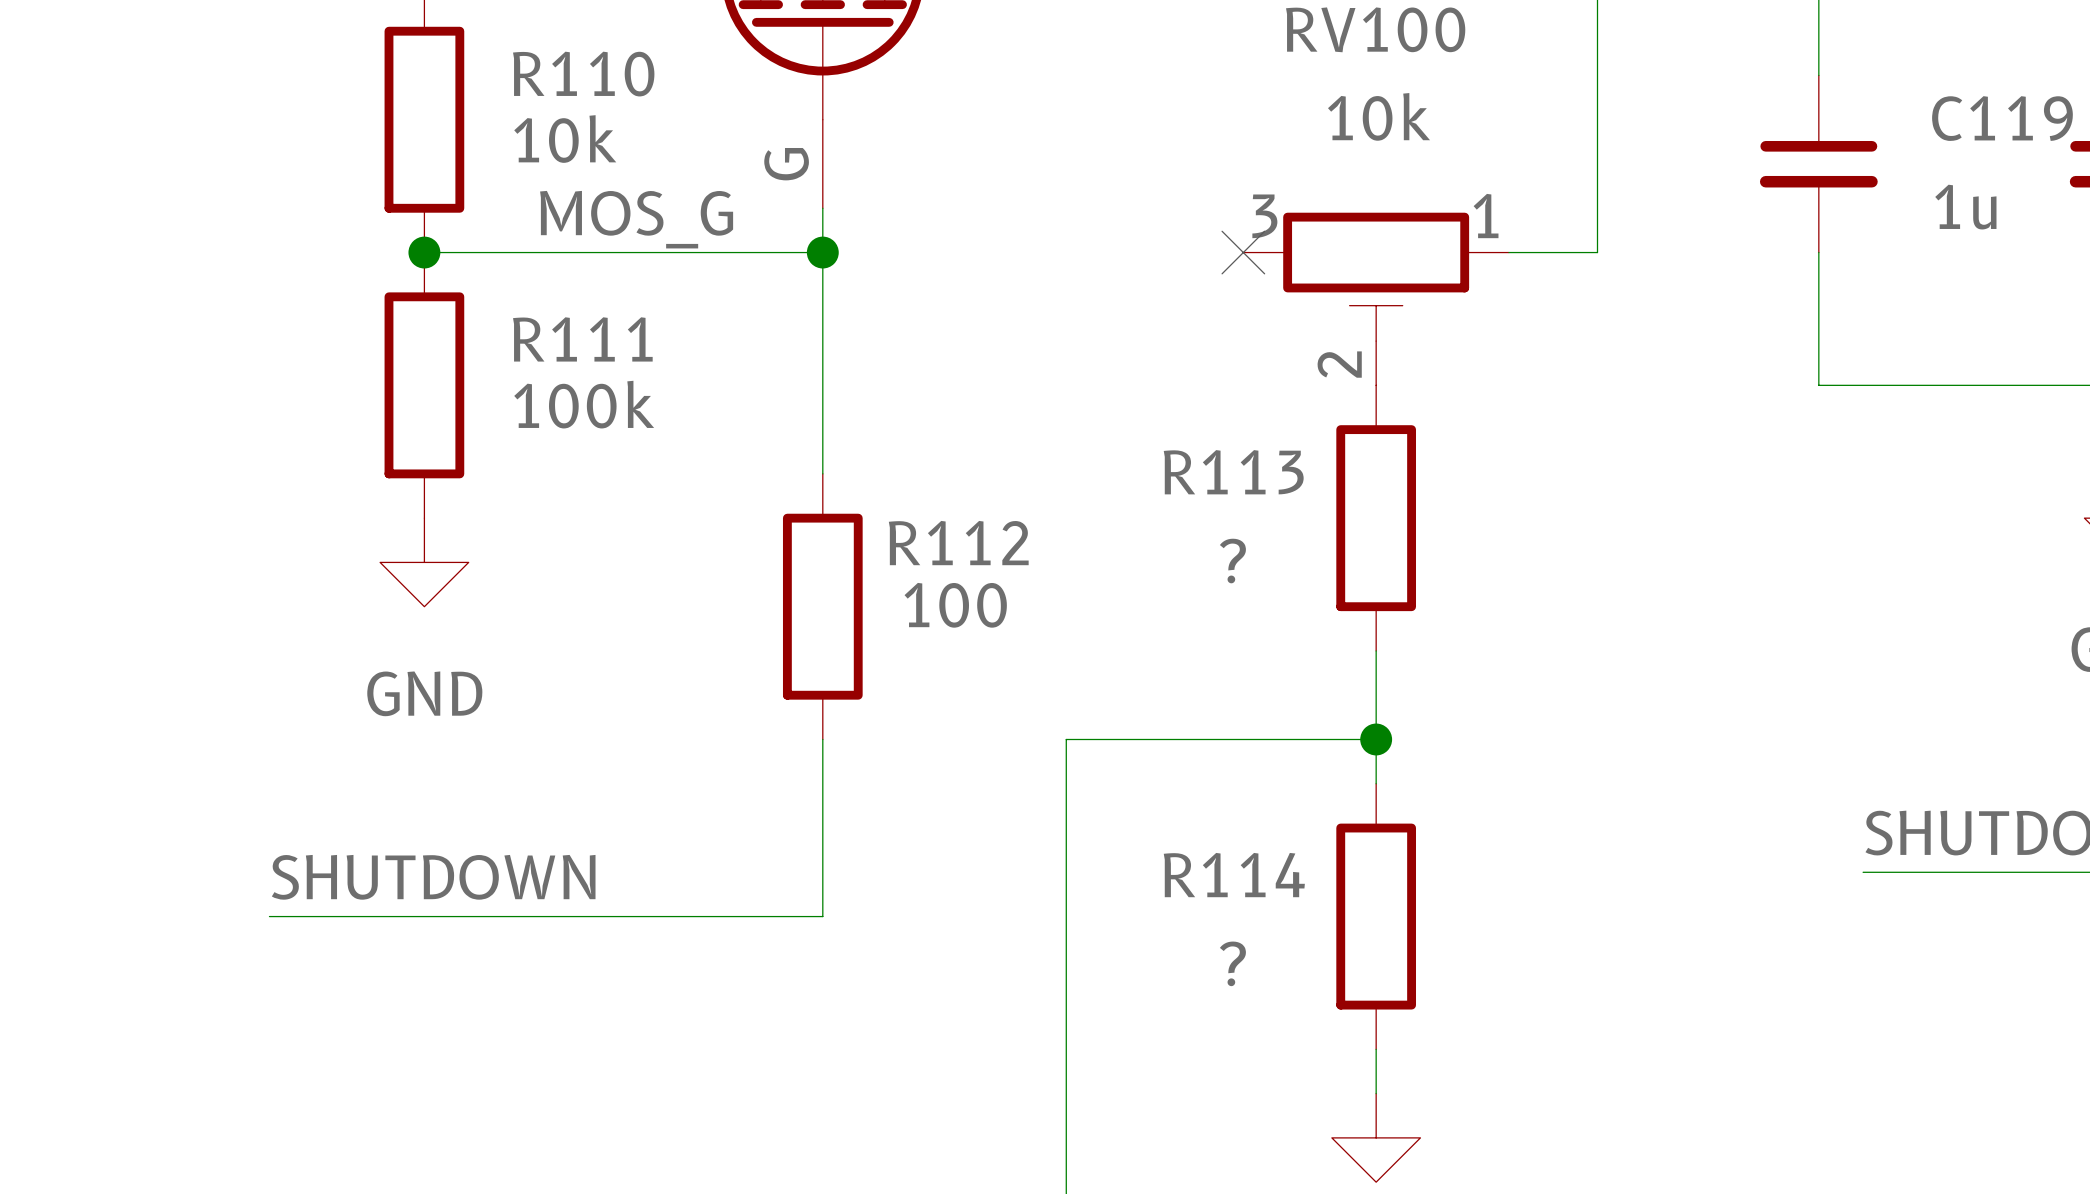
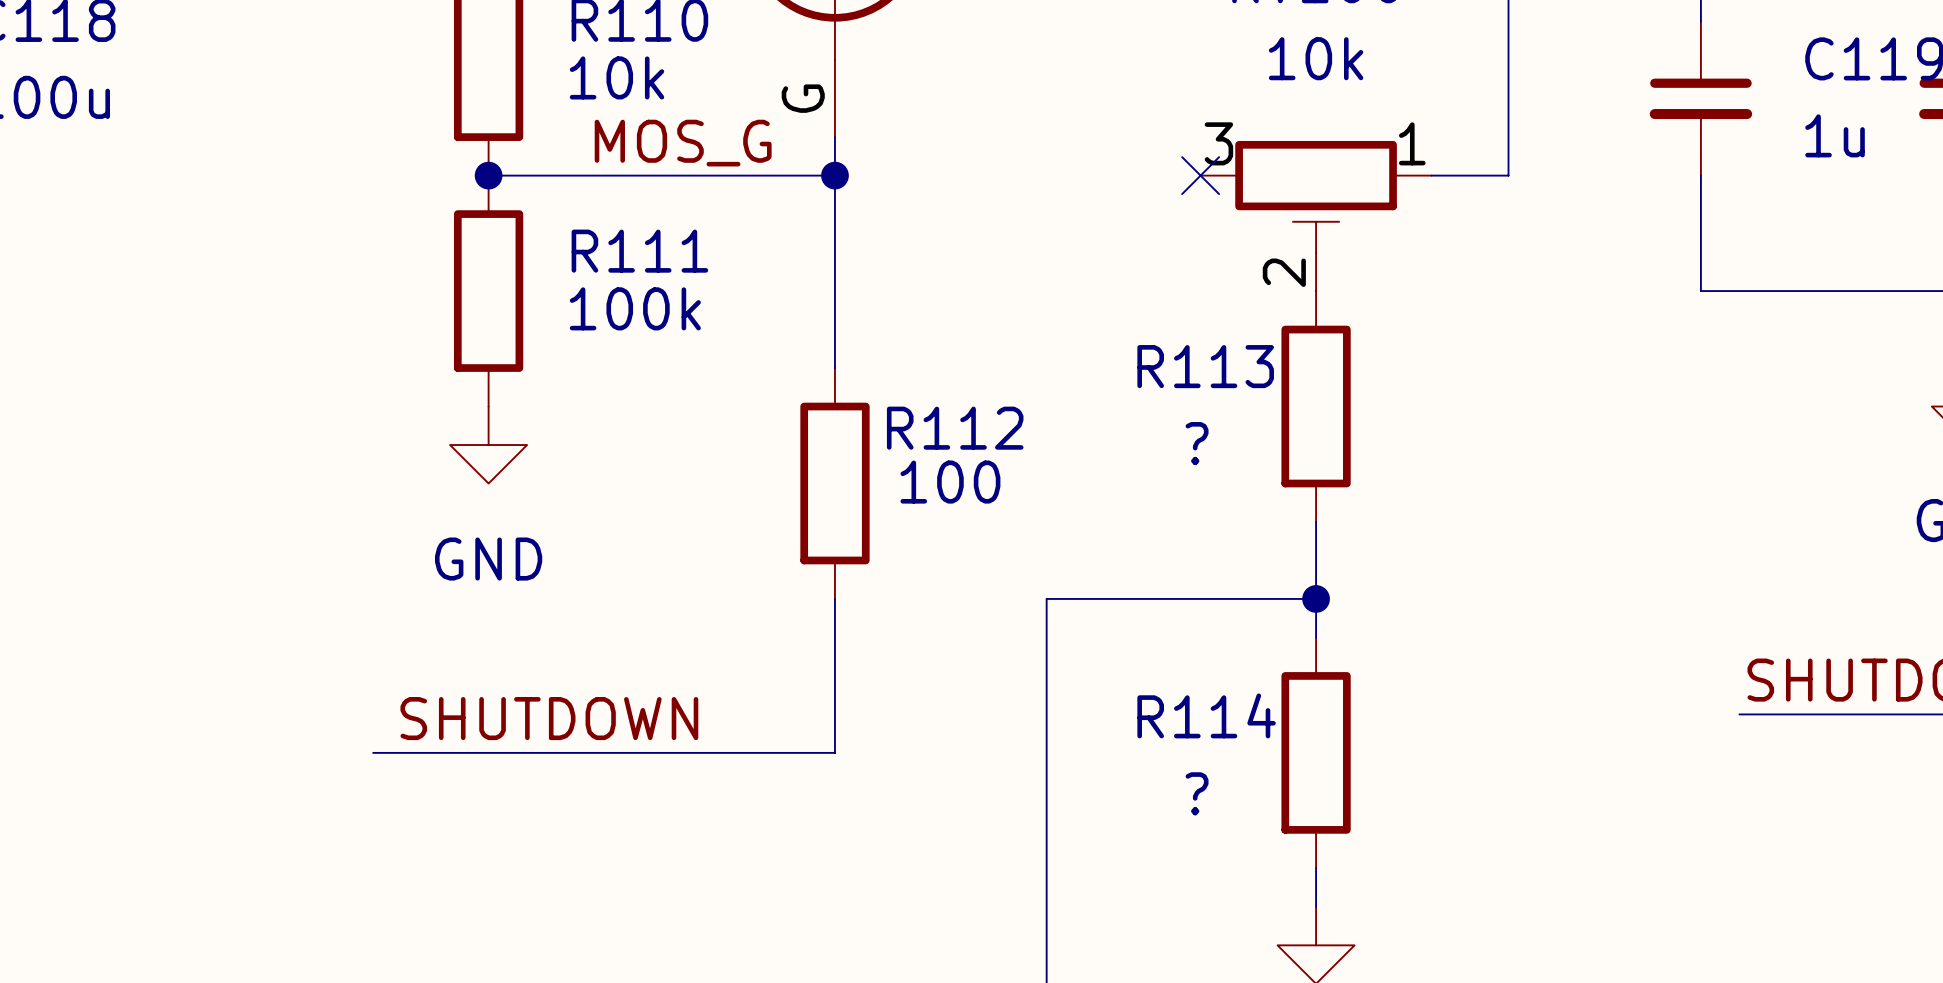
label position: SHUTDOWN (433, 877) -> SHUTDOWN (549, 718)
wire: (269, 916) (291, 916) -> none

